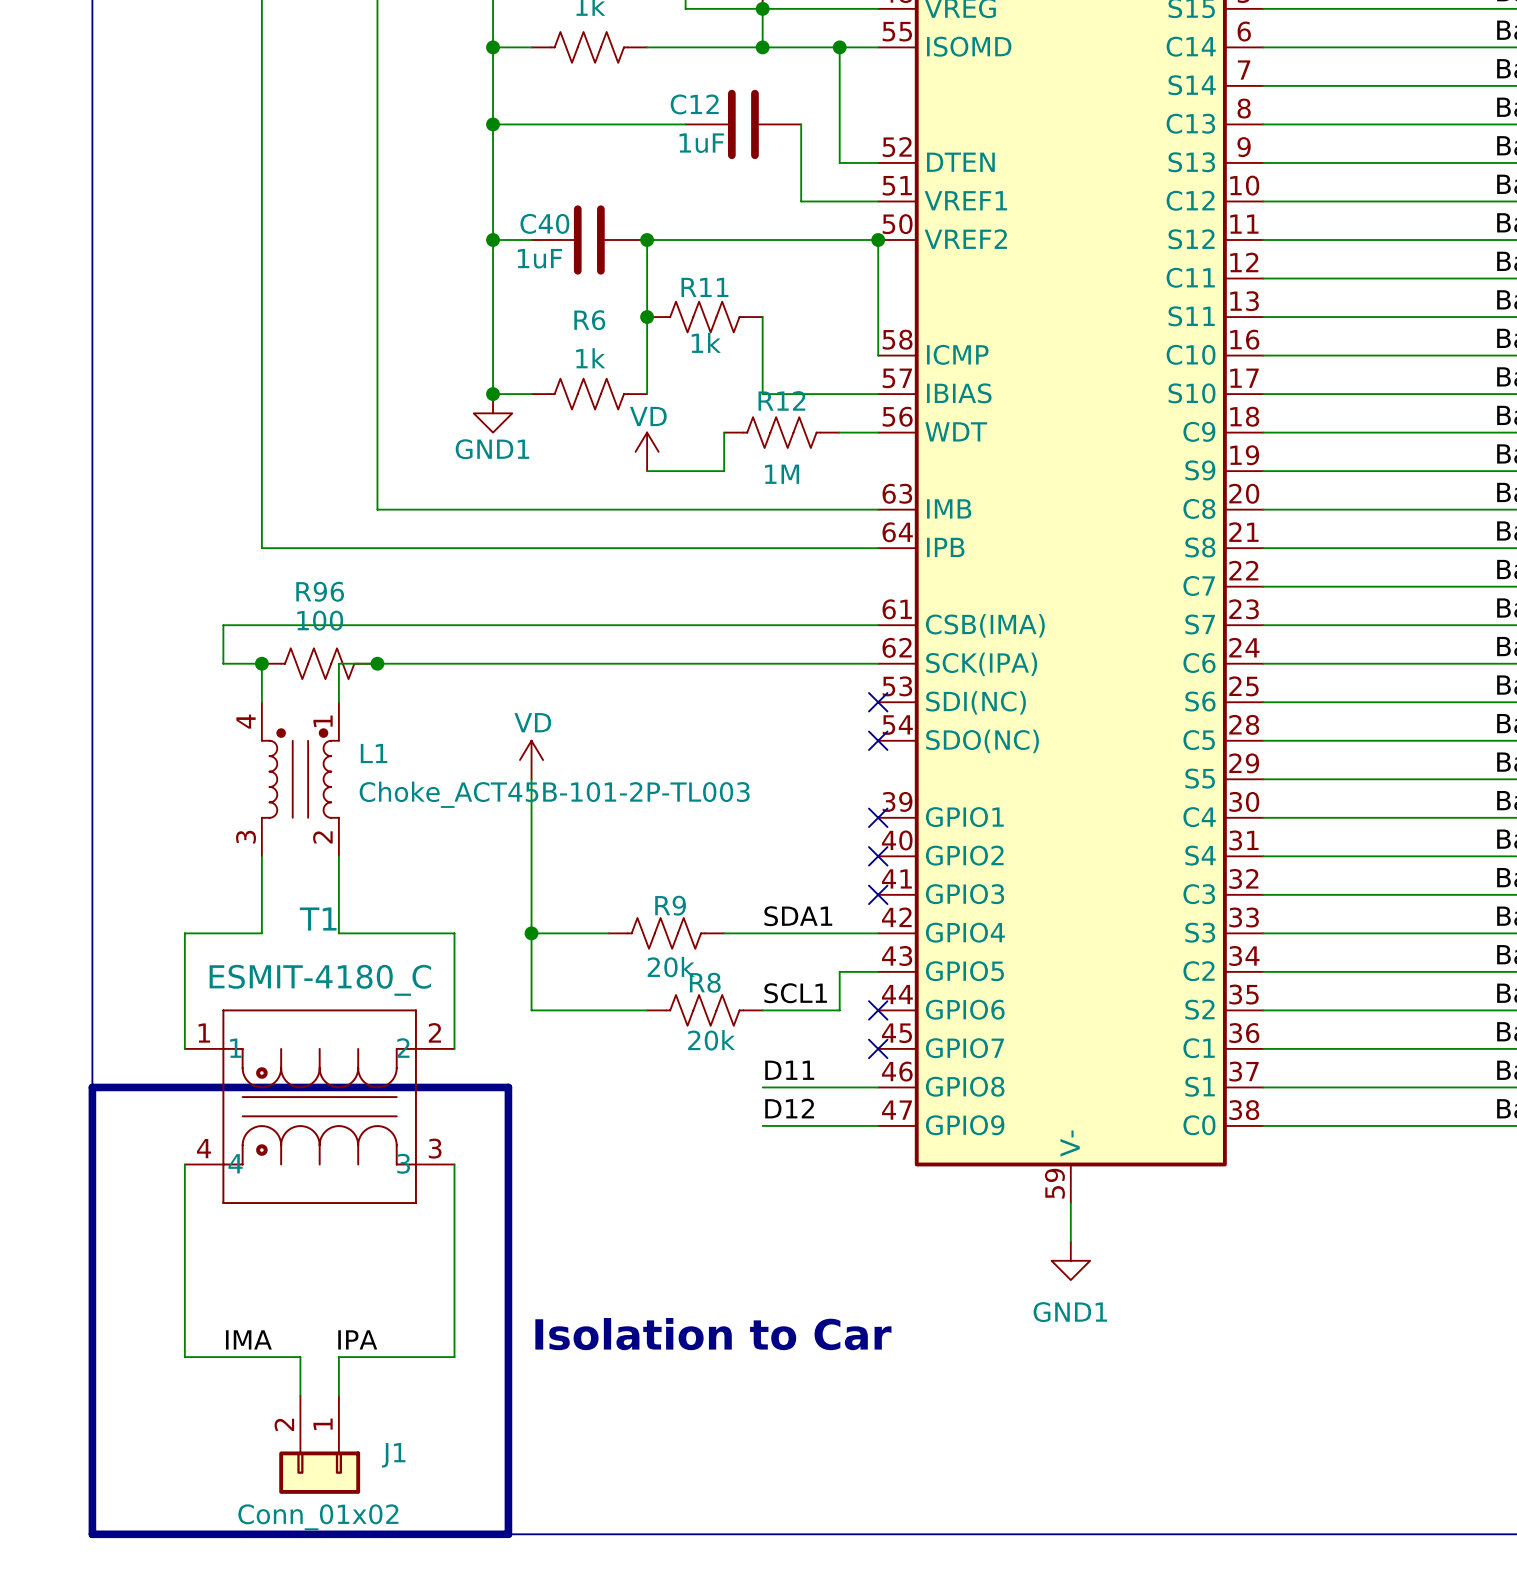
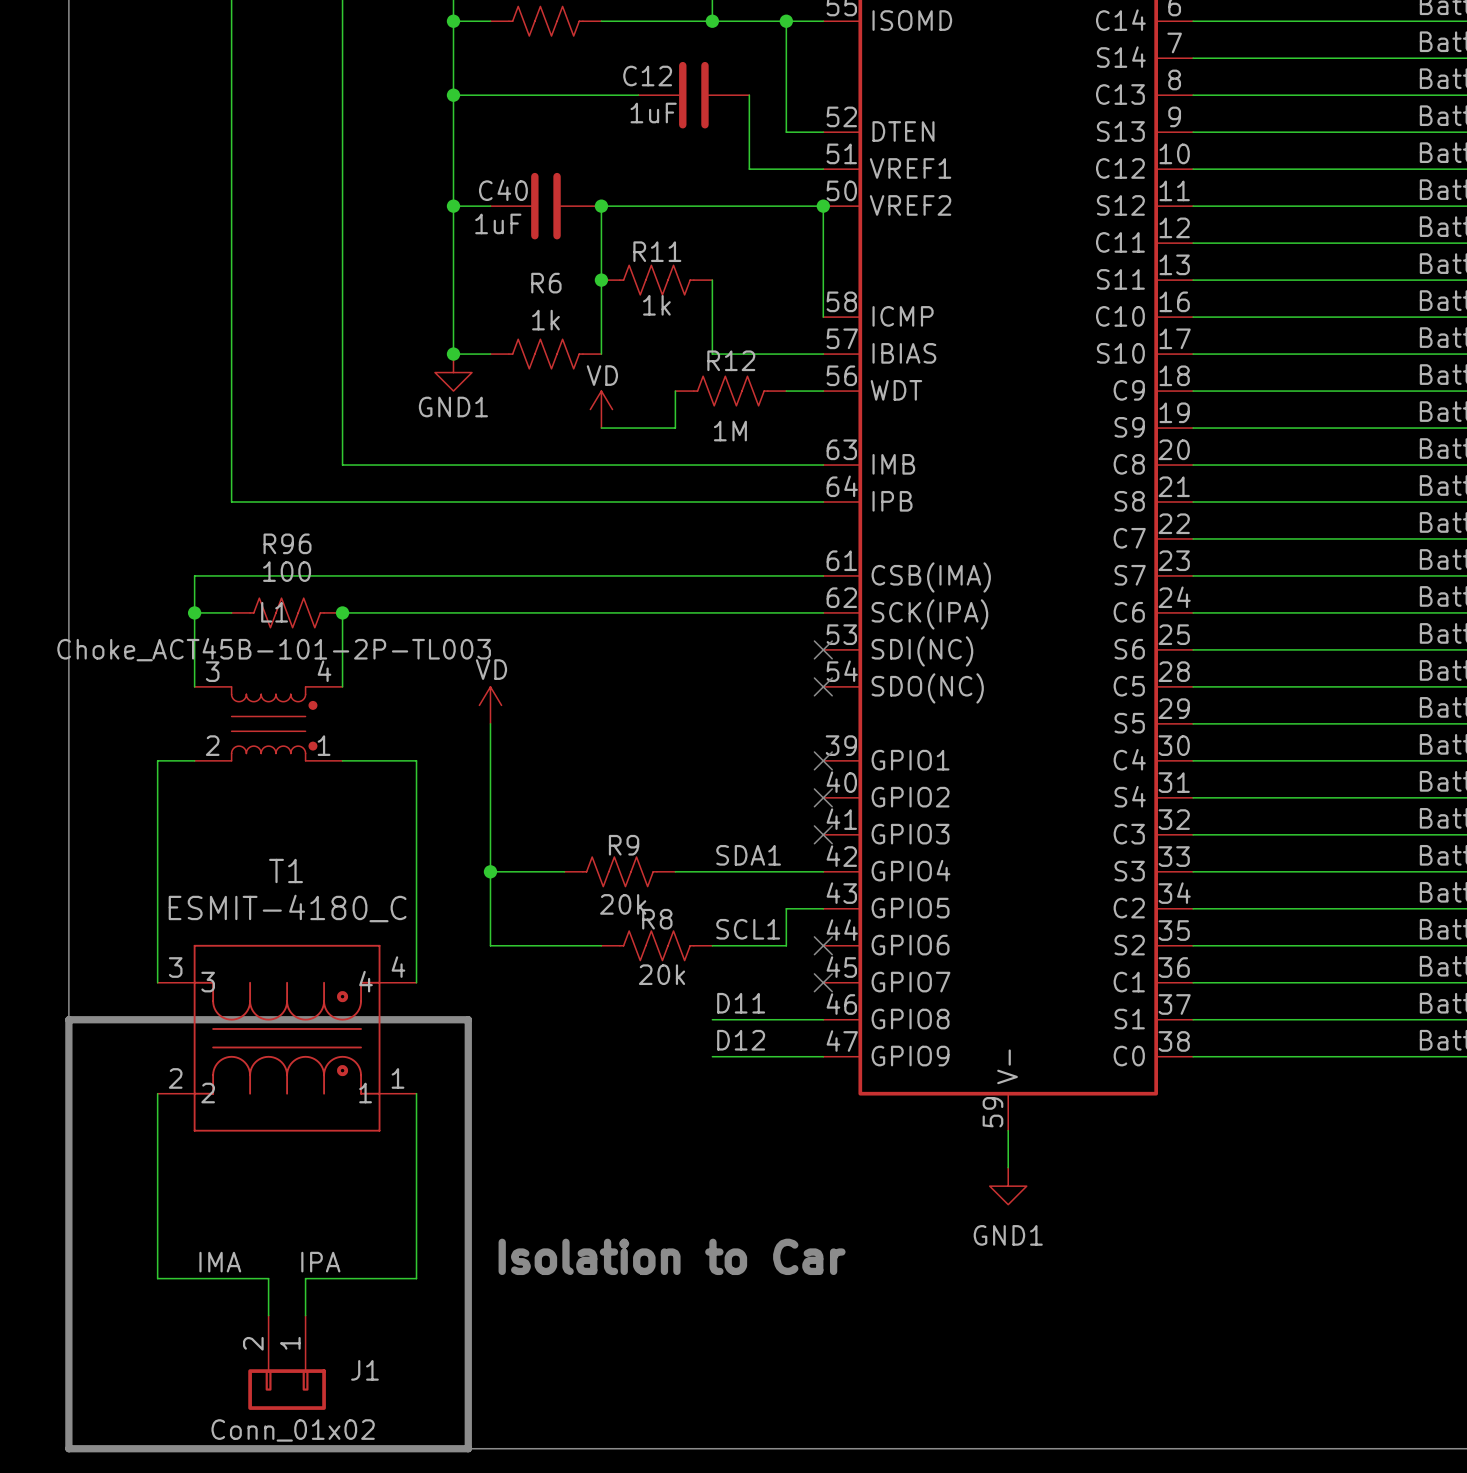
wire: none -> (194, 612) (194, 686)
wire: (261, 663) (261, 702) -> none
junction position: (261, 663) -> (194, 612)
wire: (377, 663) (338, 663) (338, 702) -> (342, 612) (342, 686)
L1 name position: L1 (374, 753) -> L1 (274, 612)
L1 rotation: 0° (300, 773) -> 90° clockwise (274, 723)
L1 value position: Choke_ACT45B-101-2P-TL003 (554, 794) -> Choke_ACT45B-101-2P-TL003 (274, 649)
wire: (261, 856) (261, 933) (184, 933) -> (194, 760) (157, 760) (157, 871)
wire: (338, 856) (338, 933) (454, 933) -> (342, 760) (416, 760) (416, 871)
T1 rotation: 0° (319, 1106) -> 180° (287, 1038)

